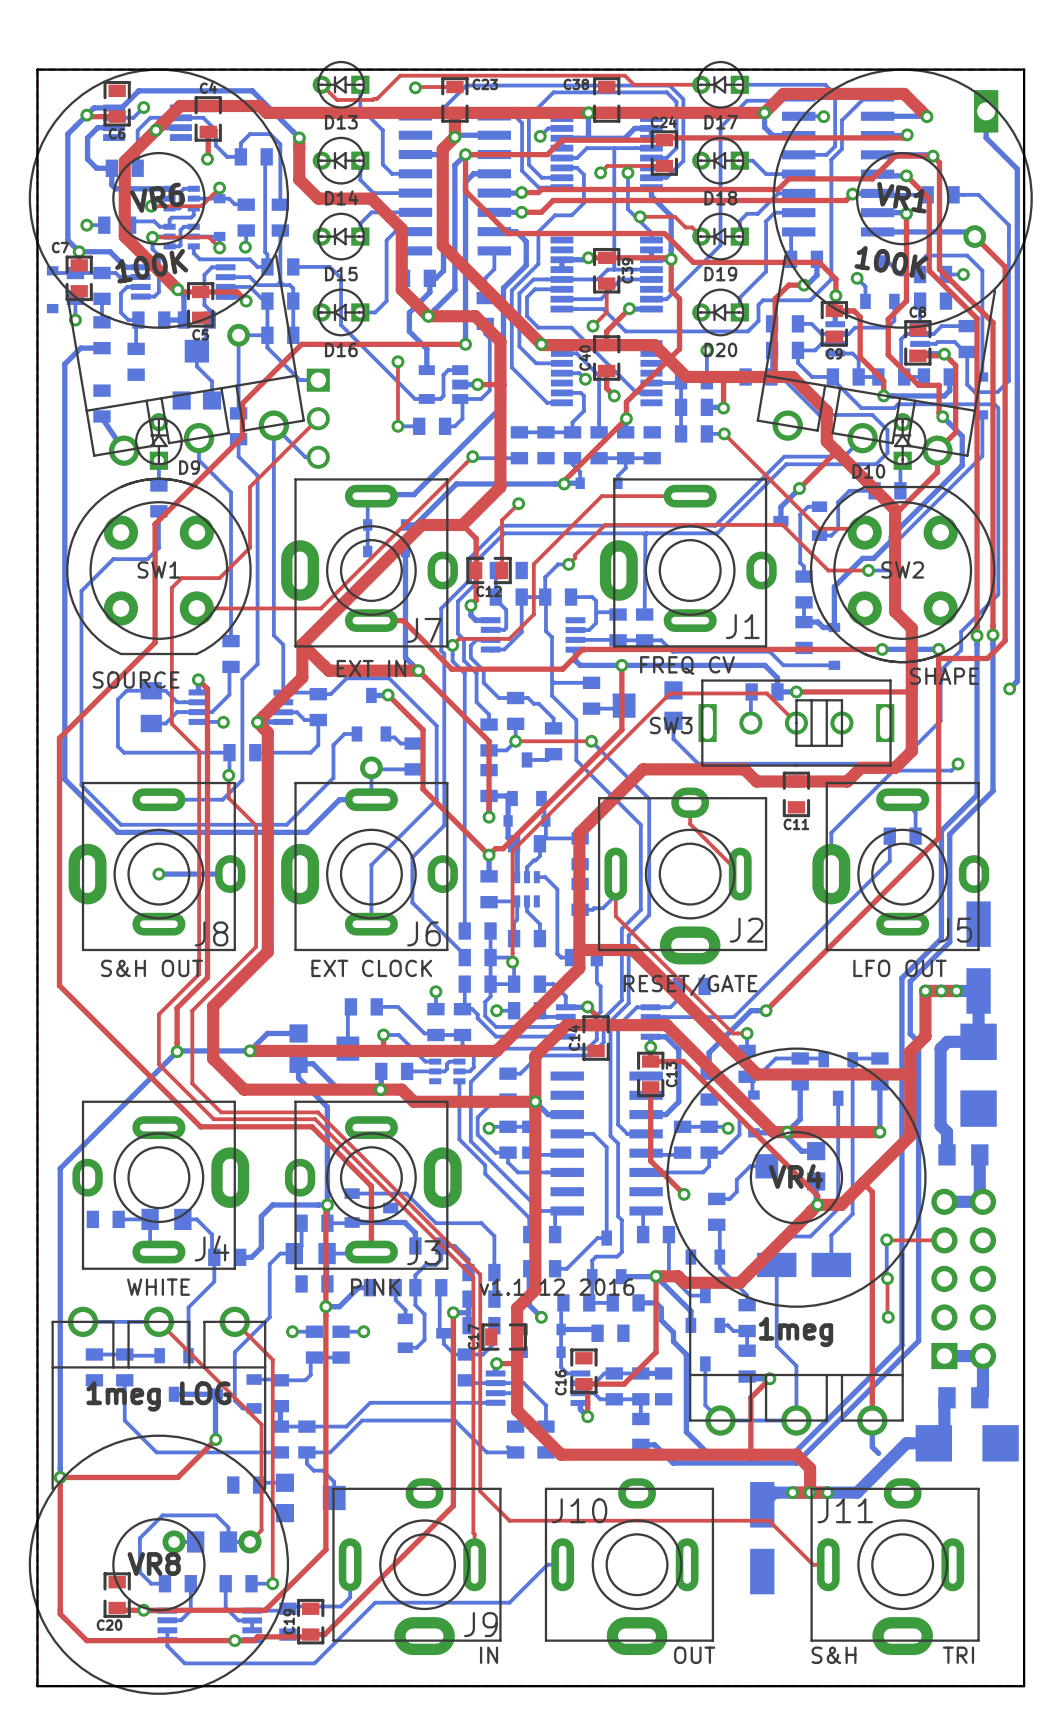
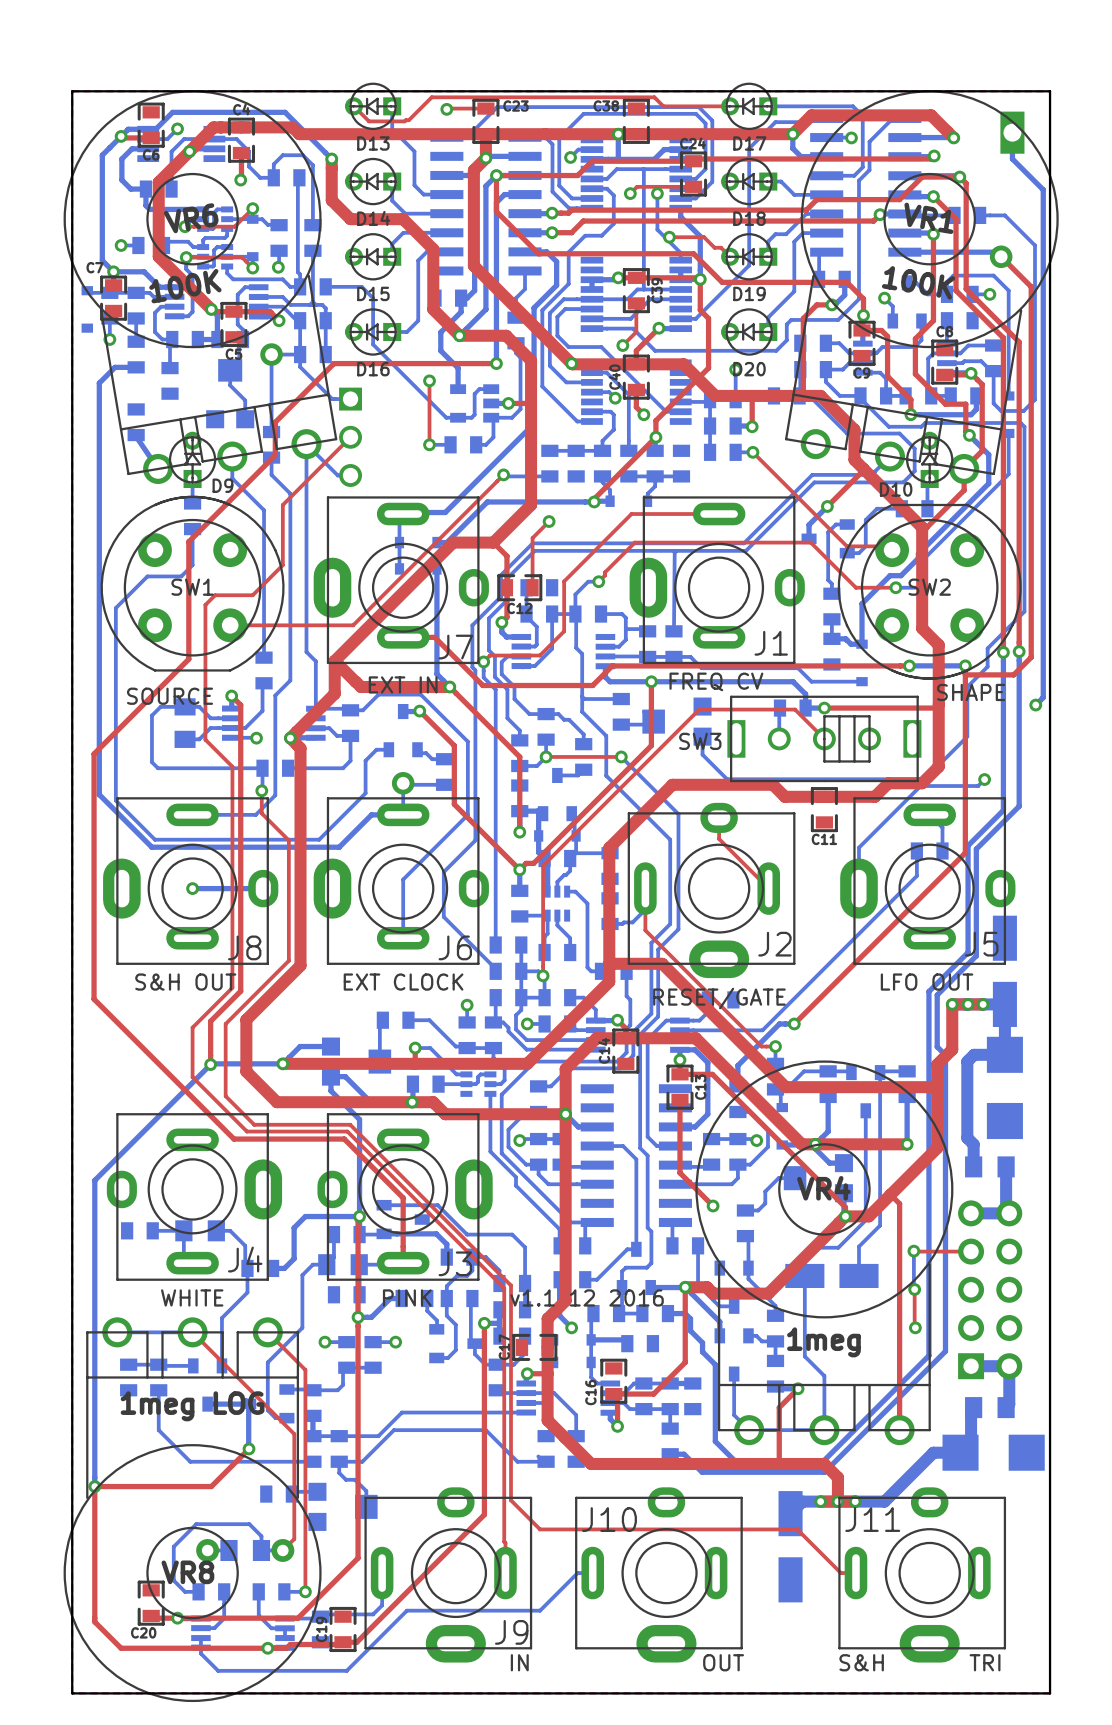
bottom track: (872, 1420) (872, 1447) (878, 1453) -> none

